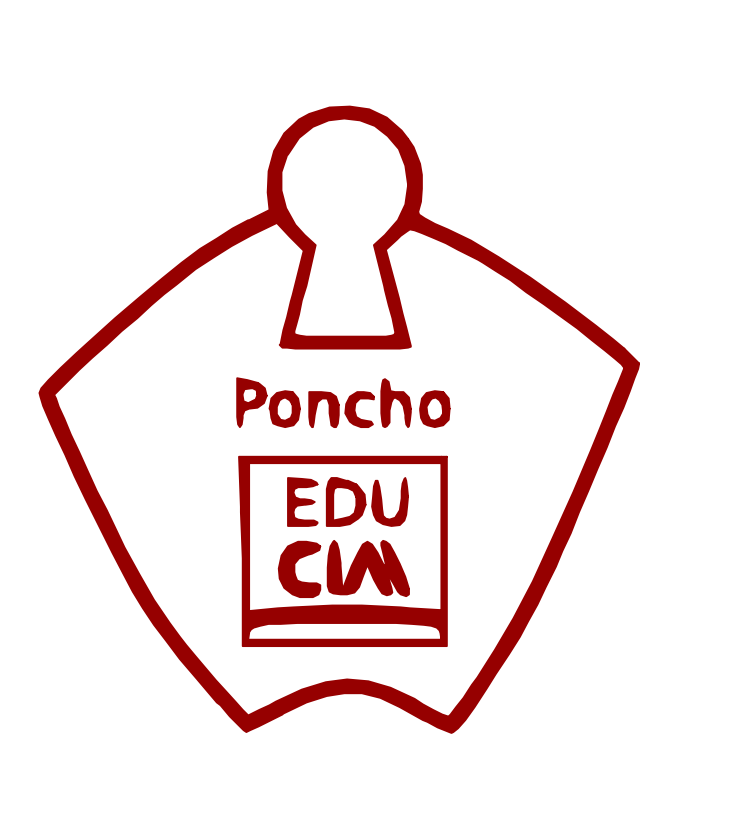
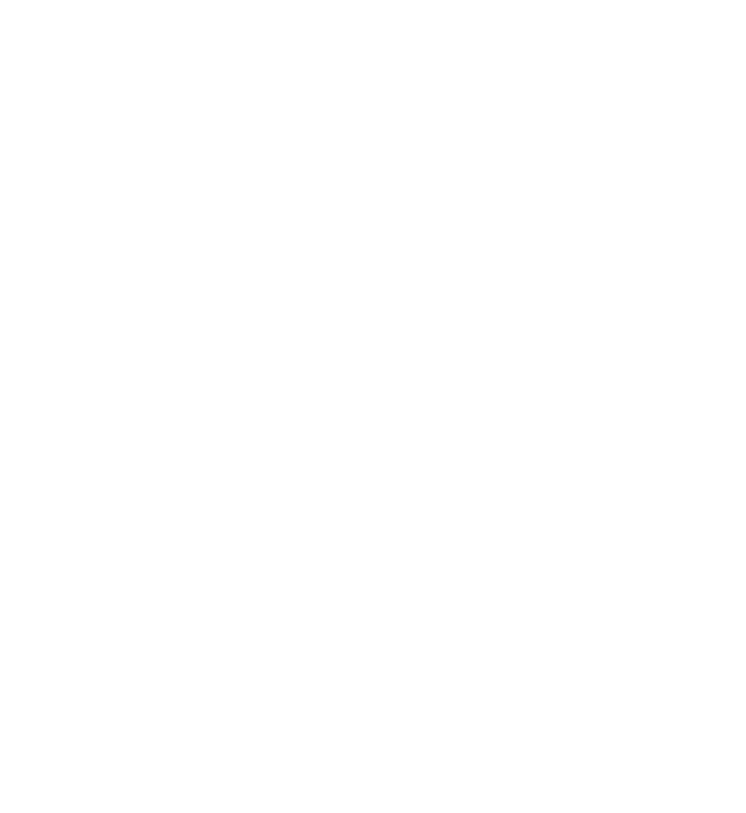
power symbol: (339, 419) -> none

